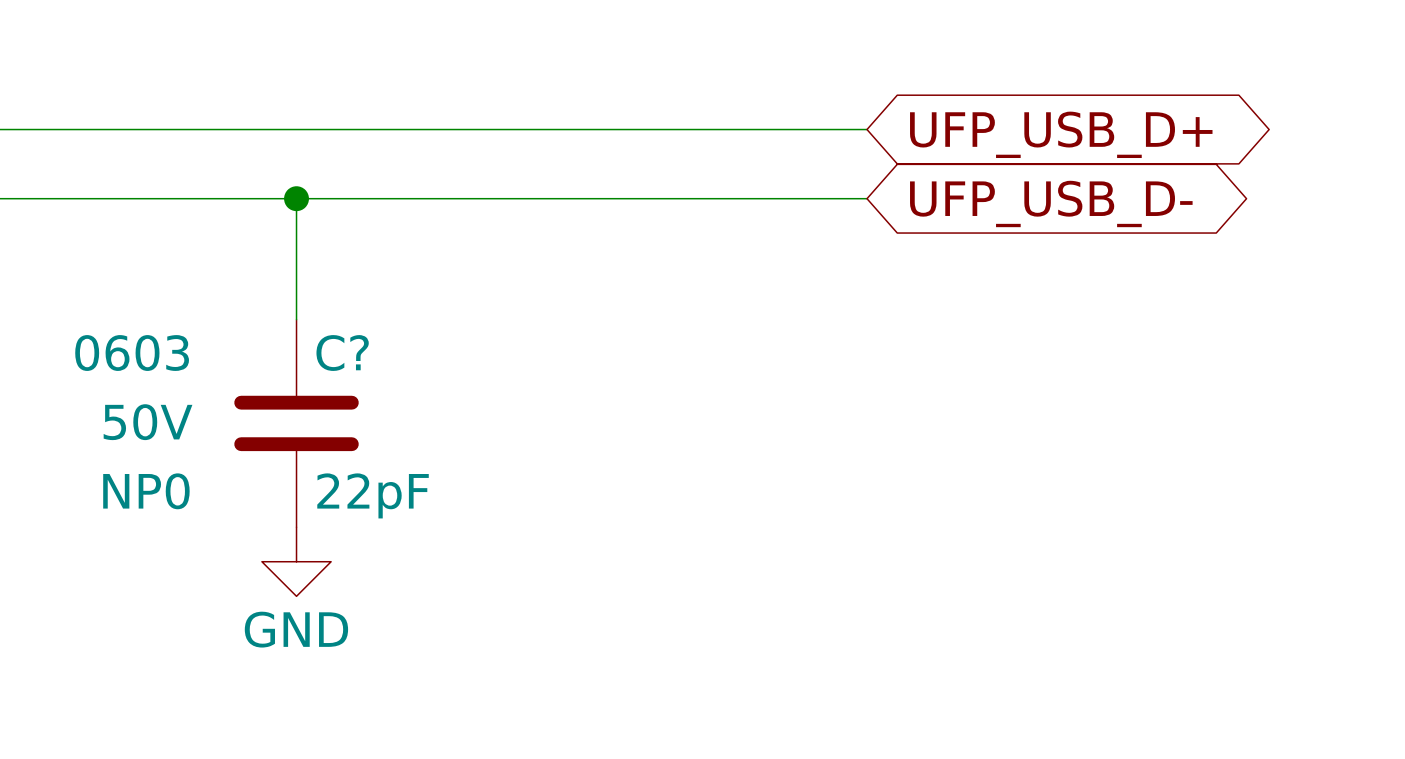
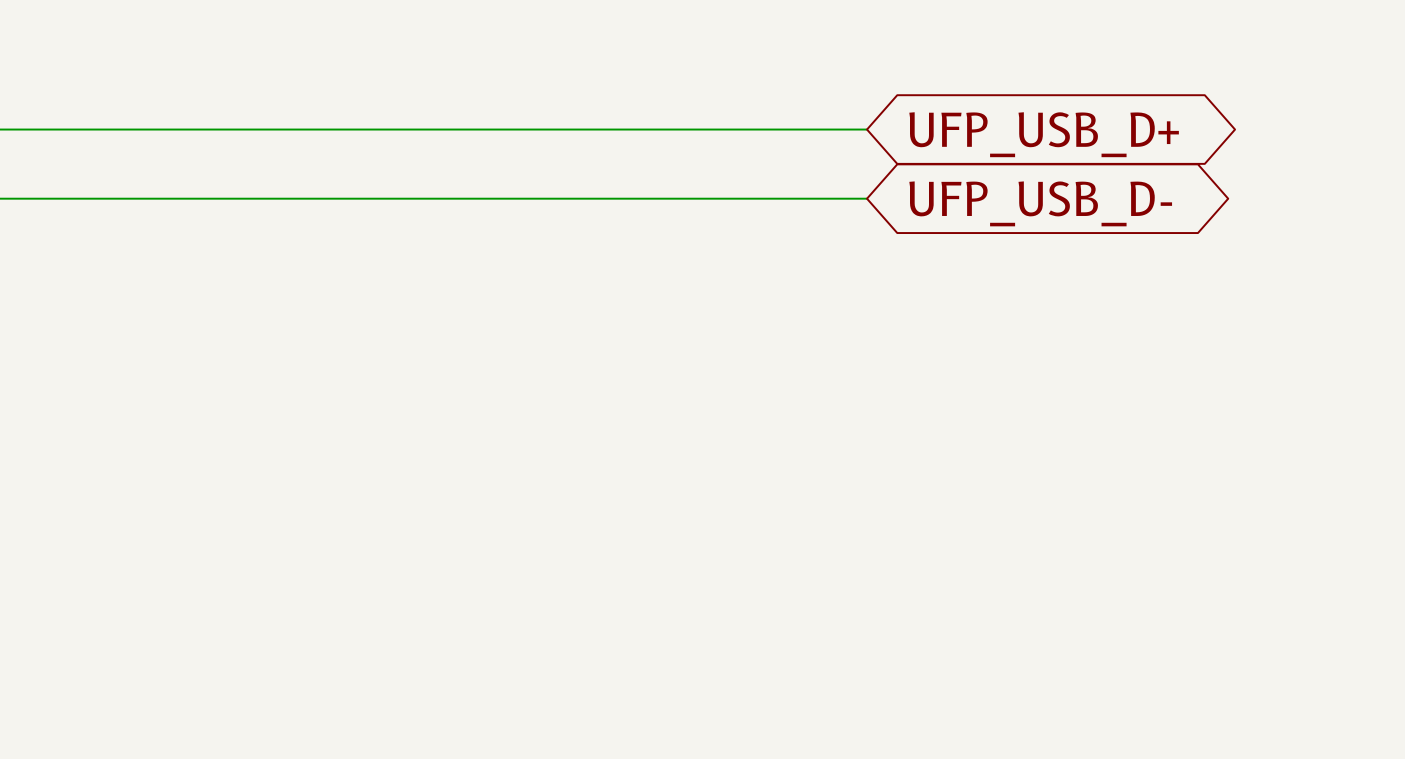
wire: (296, 198) (296, 319) -> none
junction: (296, 198) -> none
C?: 22pF (296, 423) -> none
power symbol: GND (296, 561) -> none

